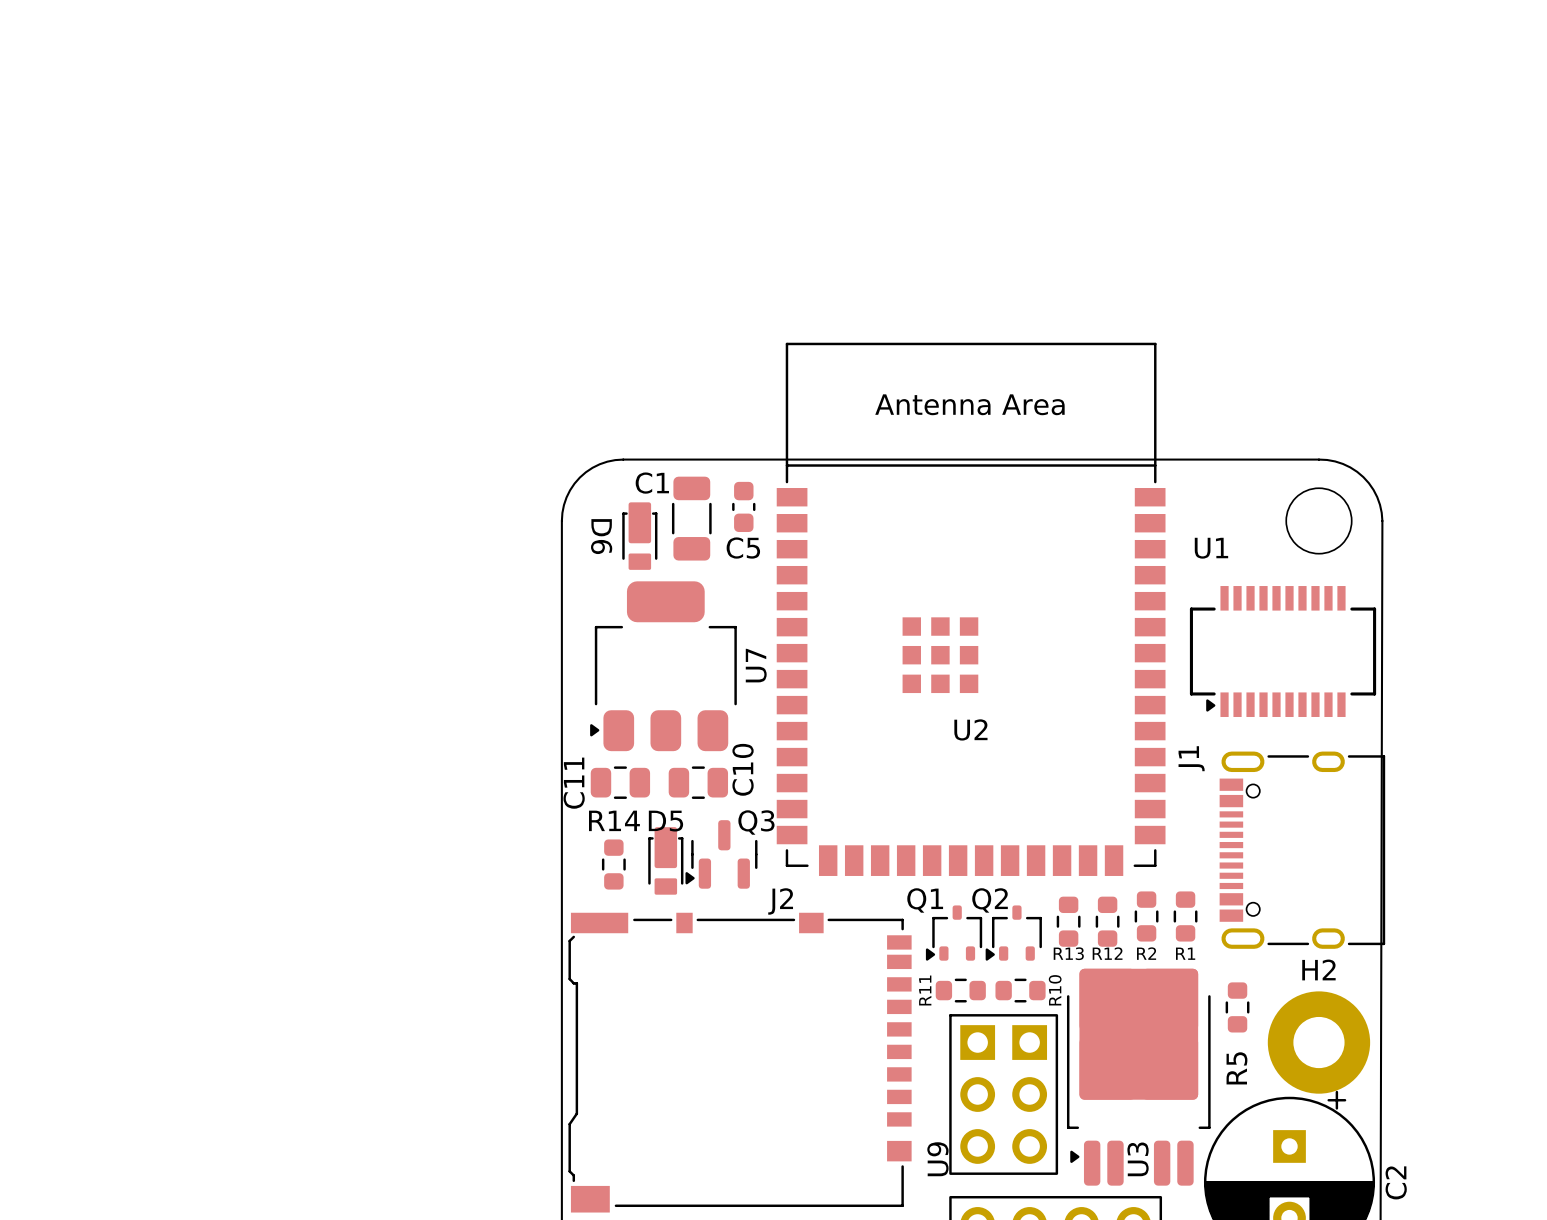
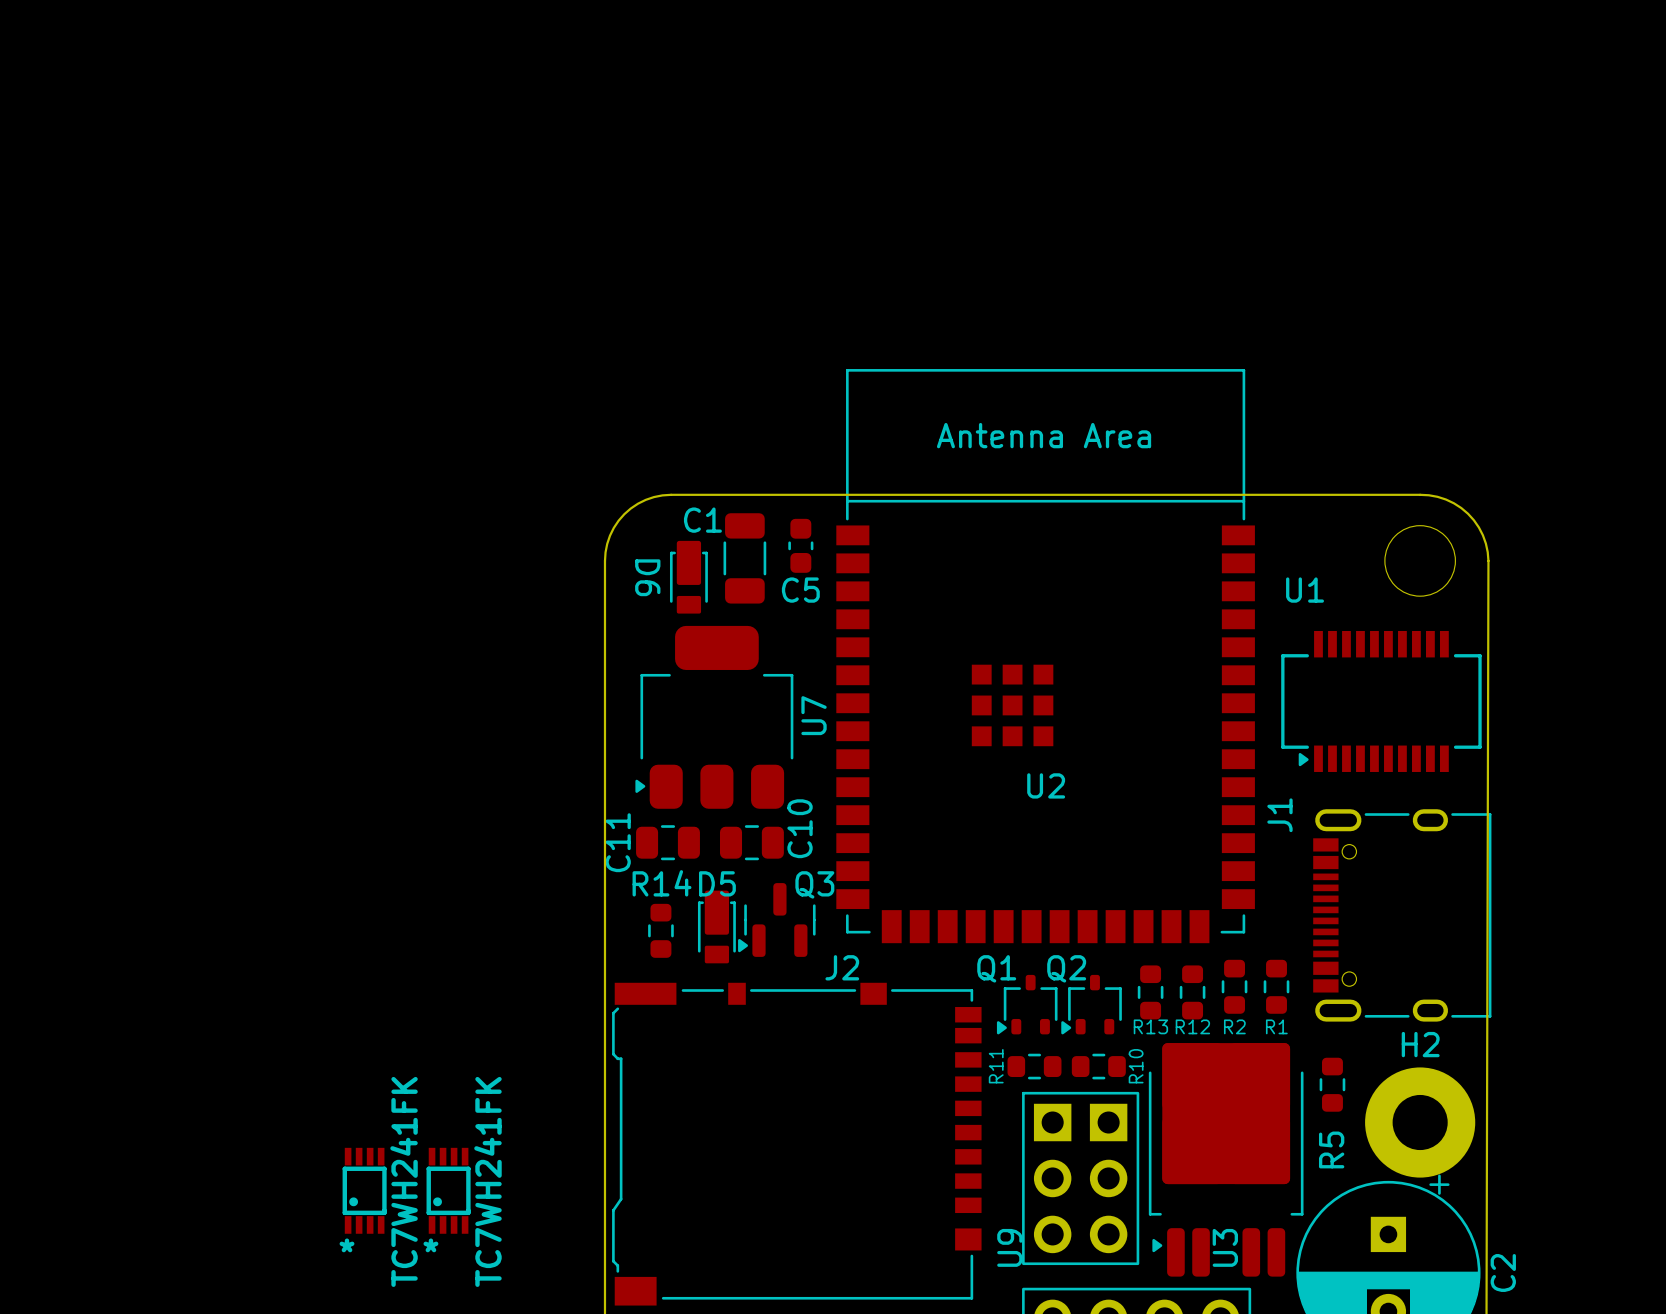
part: none -> TC7WH241FK (364, 1190)
part: none -> TC7WH241FK (448, 1190)

